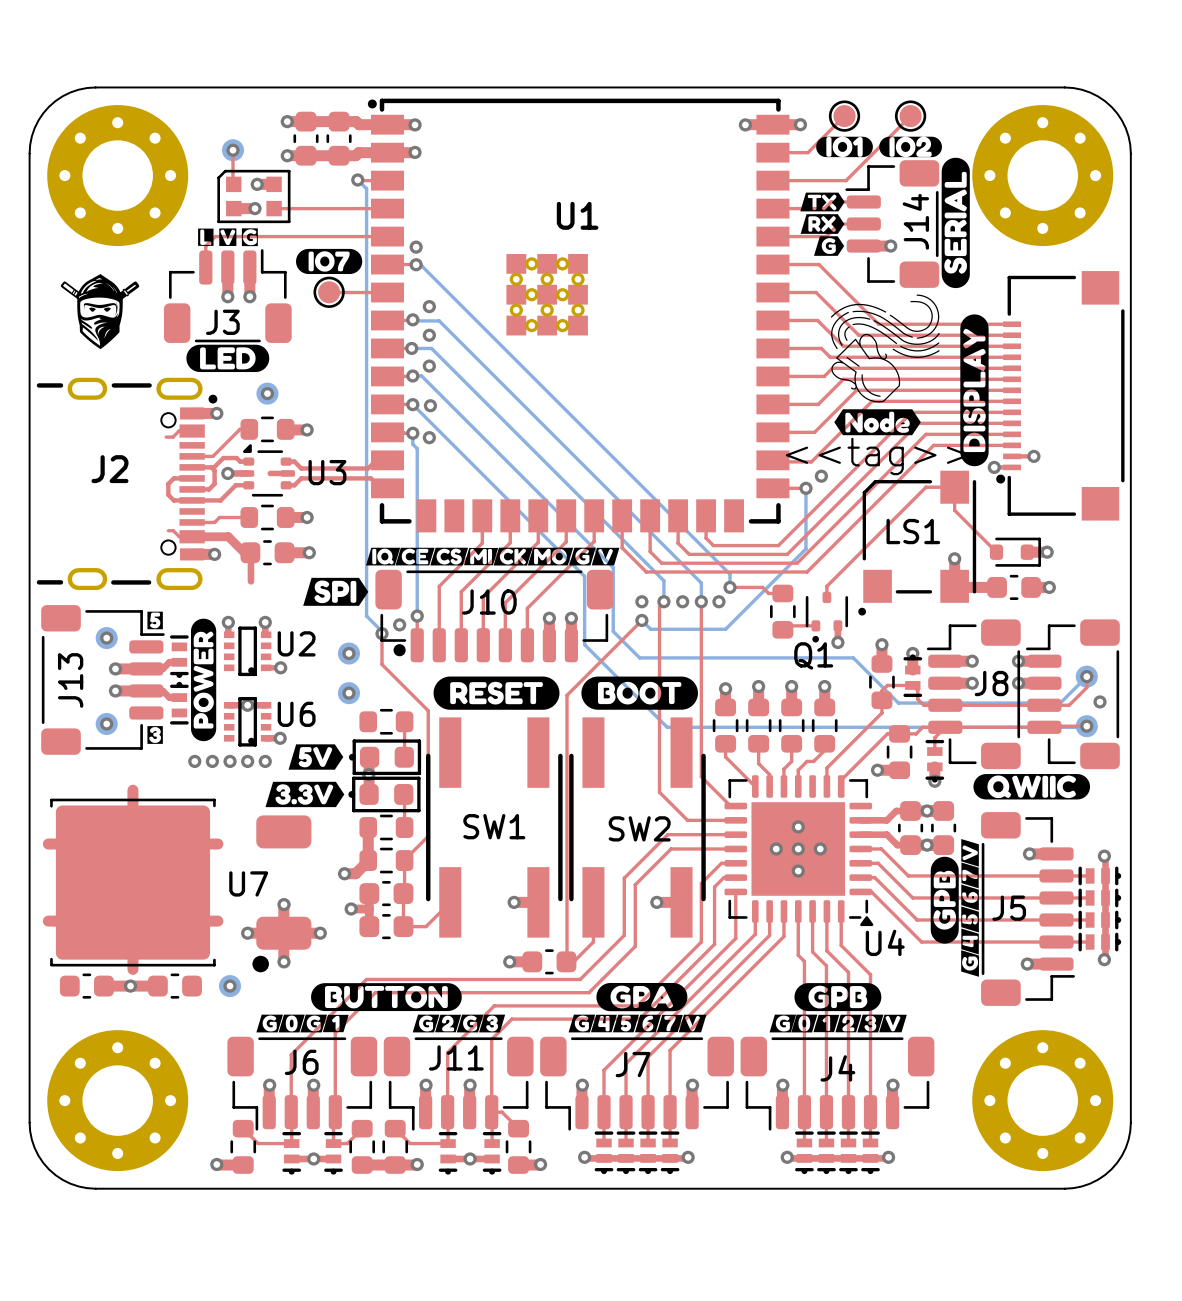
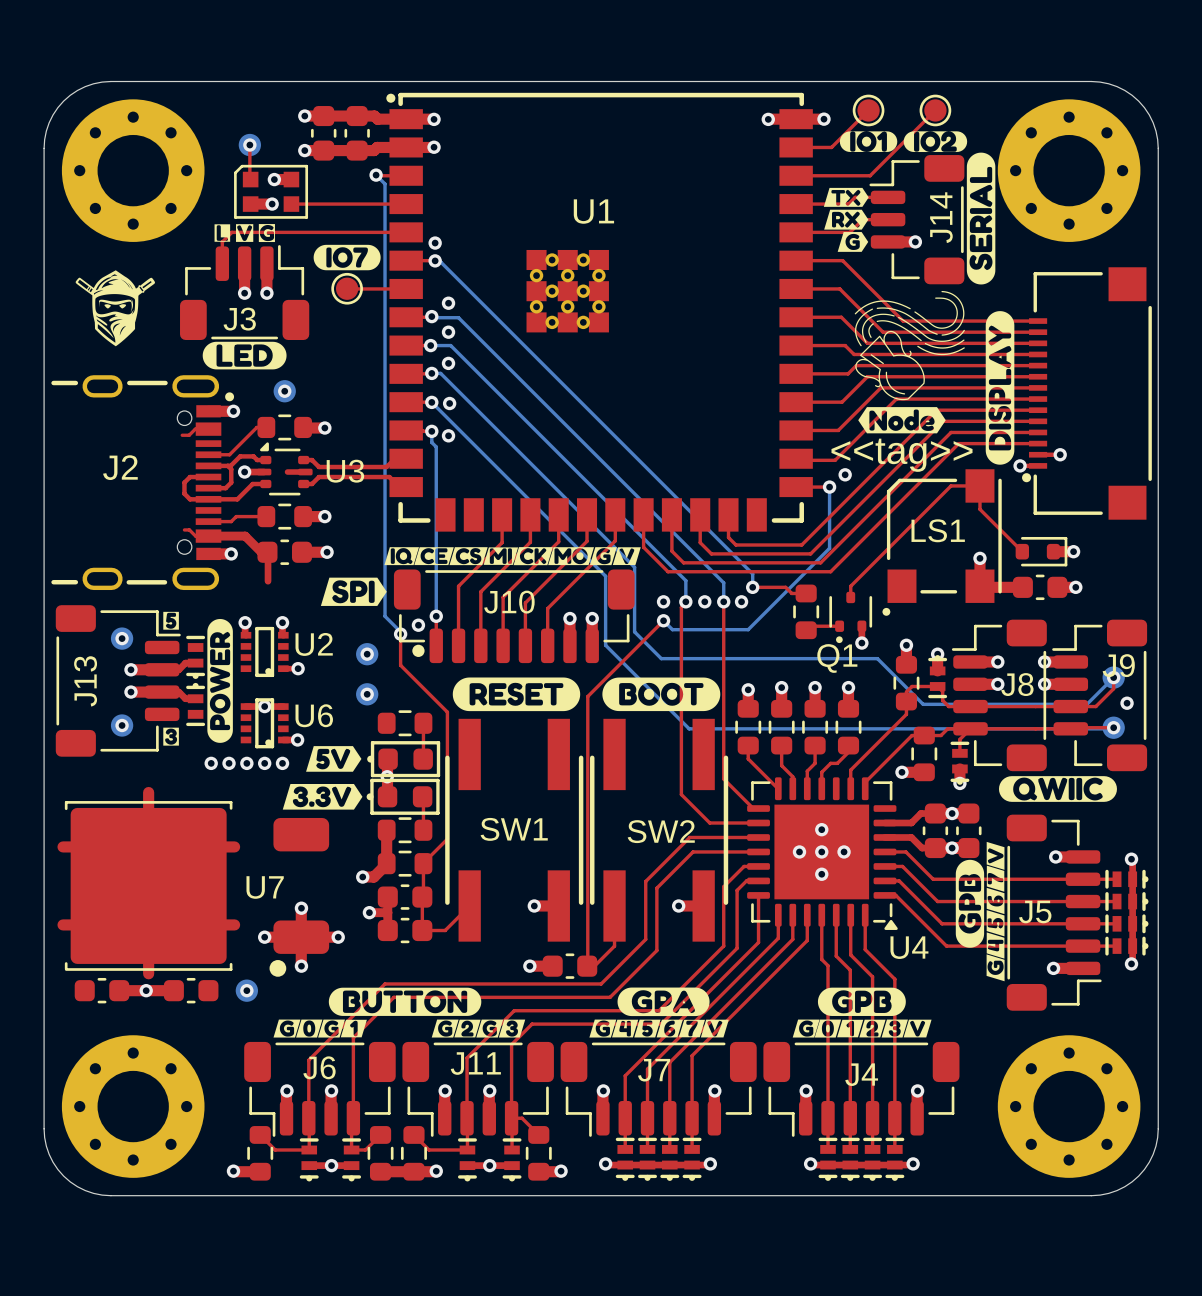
J9 name: none -> J9 (1118, 665)

